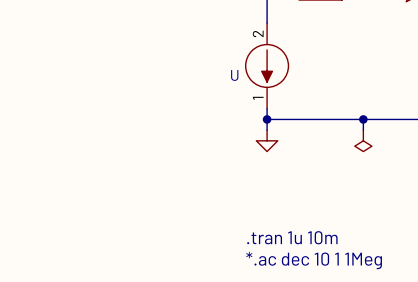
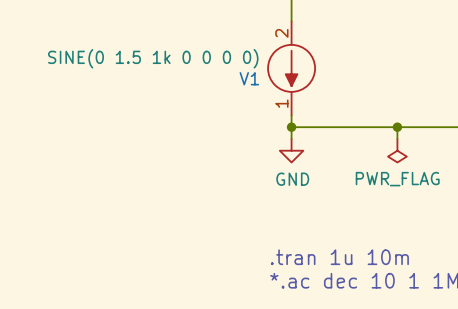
U value: none -> SINE(0 1.5 1k 0 0 0 0) (153, 58)
U name: U (234, 75) -> V1 (249, 78)
power symbol text: none -> GND (292, 179)
power symbol text: none -> PWR_FLAG (397, 179)

